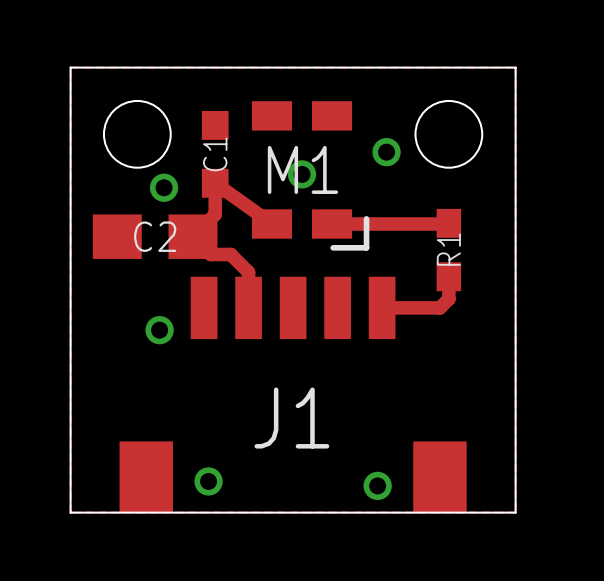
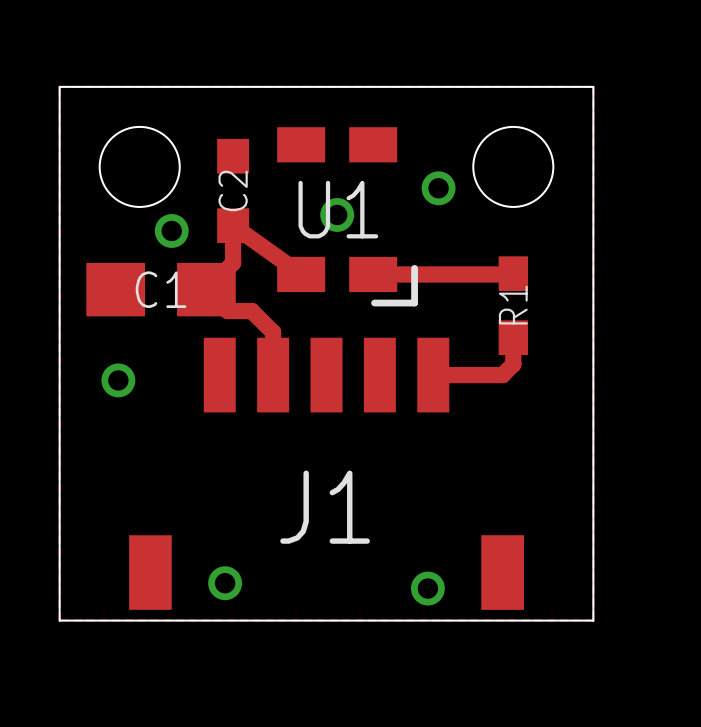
C1 name: C1 (215, 154) -> C2 (233, 190)
M1 name: M1 (302, 169) -> U1 (338, 209)
C2 name: C2 (155, 236) -> C1 (161, 289)
J1 footprint: [119, 276, 467, 513] -> [129, 337, 524, 610]
via position: (159, 330) -> (118, 380)

